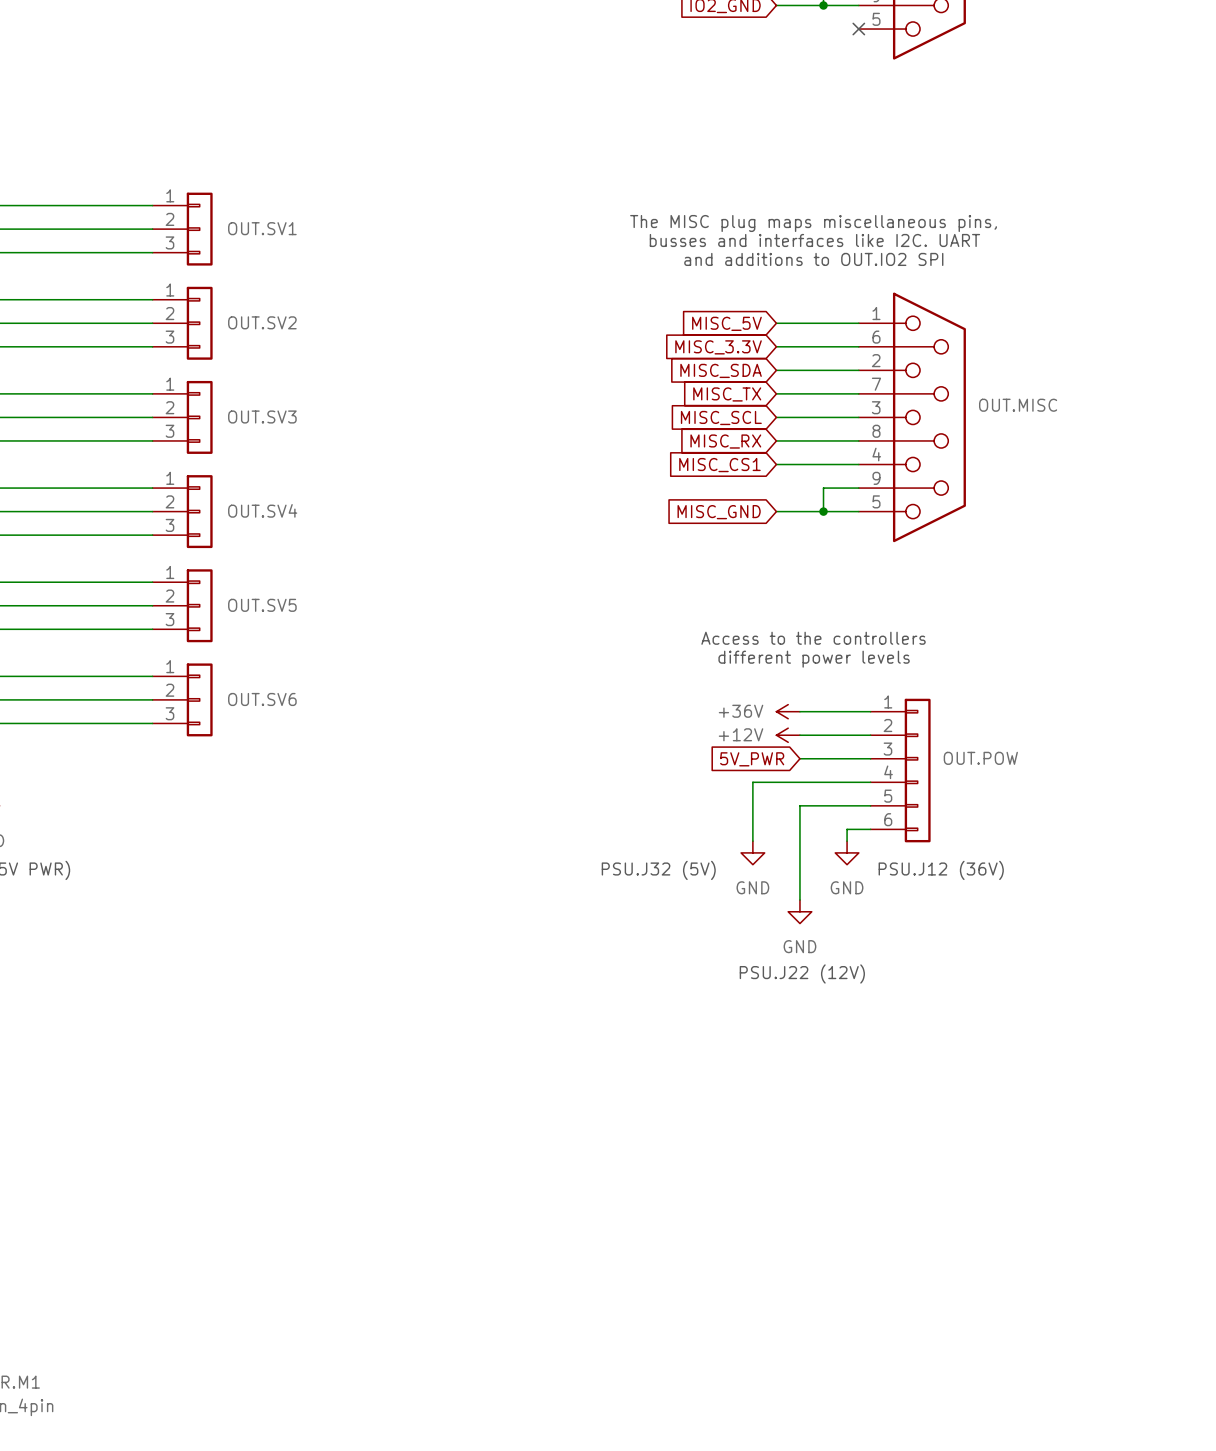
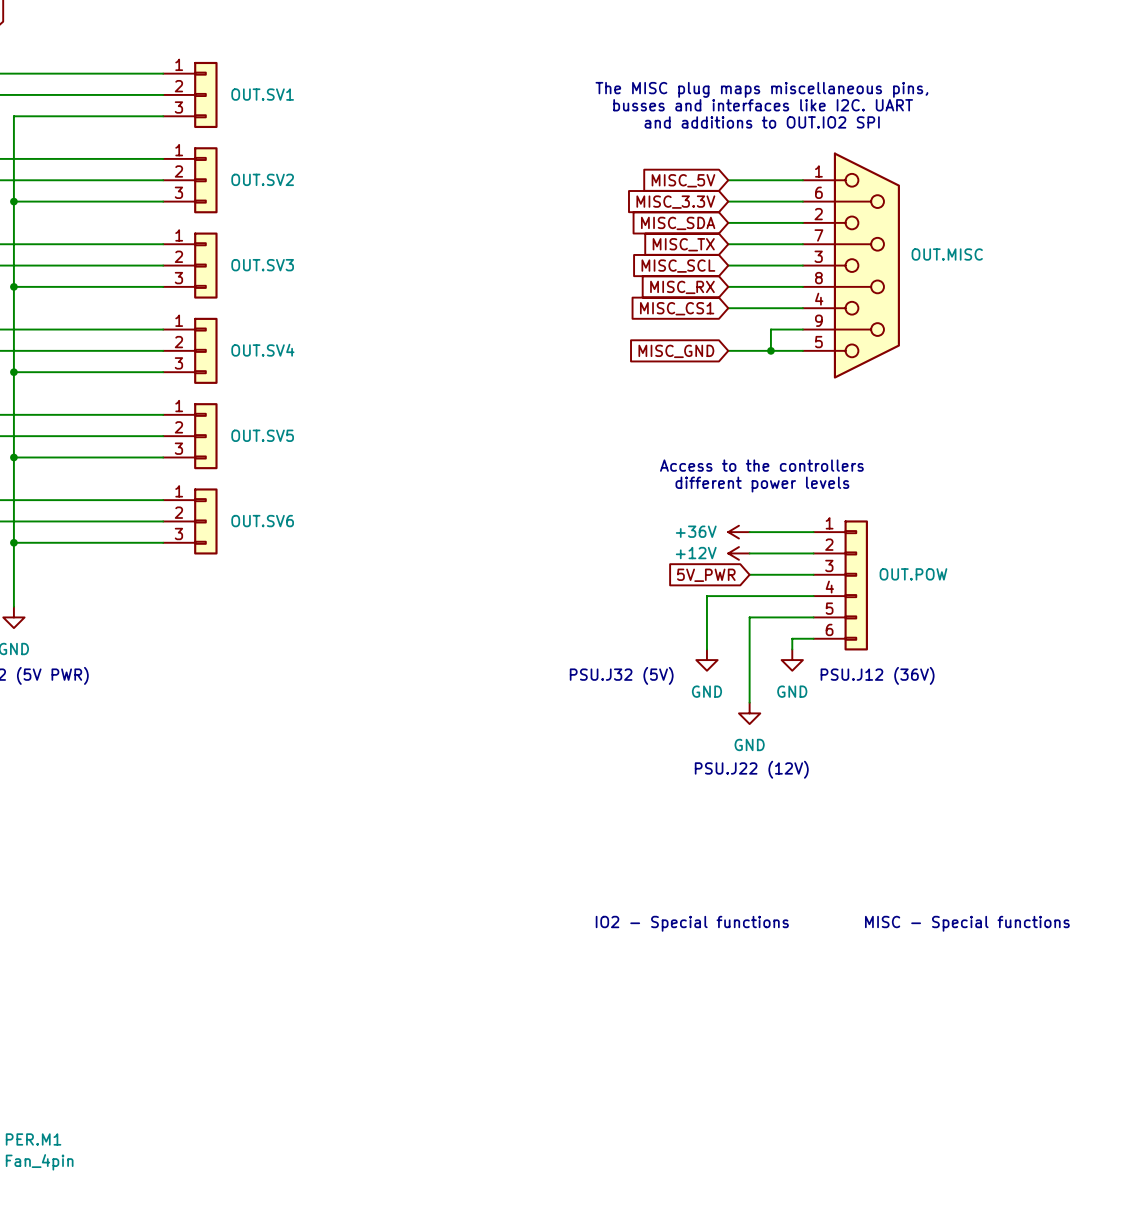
text: none -> IO2 - Special functions (692, 923)
text: none -> MISC - Special functions (967, 923)

